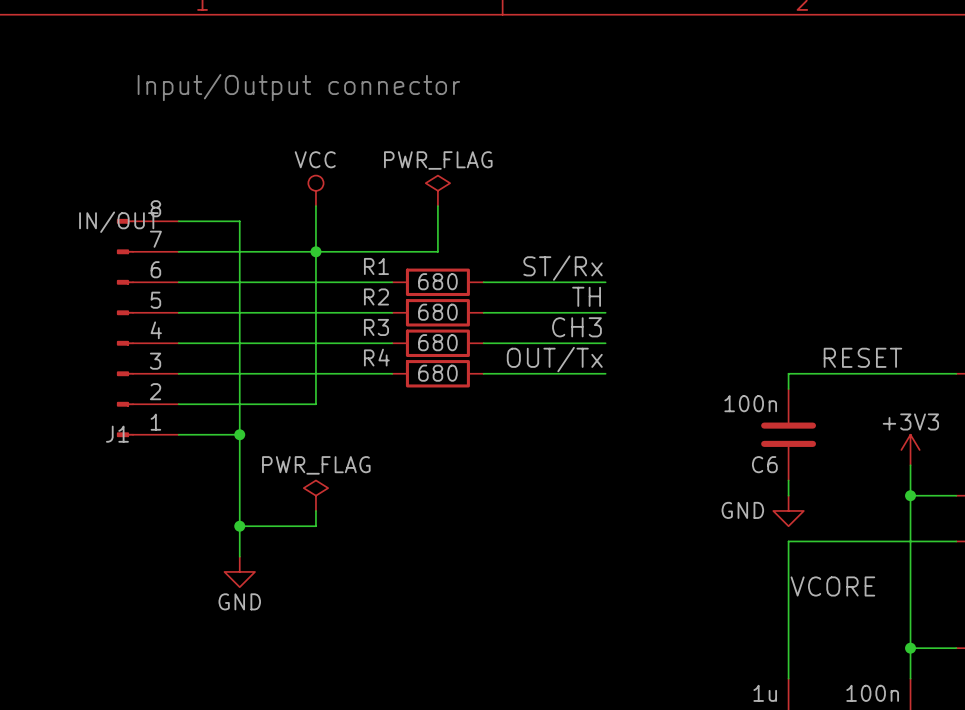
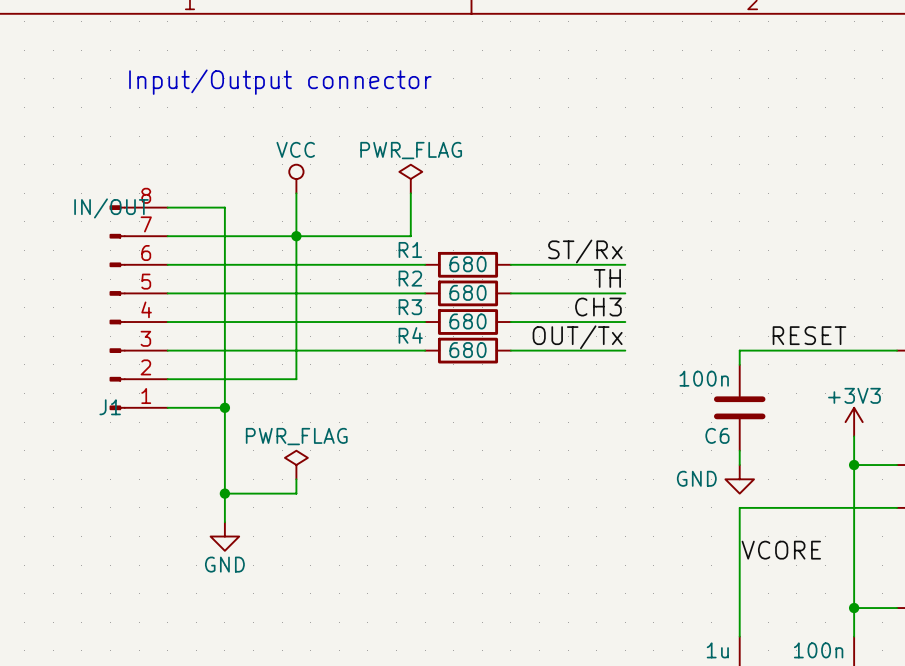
label position: ST/Rx (563, 268) -> ST/Rx (585, 251)
R1 position: (437, 282) -> (468, 264)
wire: (483, 282) (544, 282) -> (367, 264) (425, 264)
wire: none -> (568, 264) (625, 264)
label position: TH (586, 296) -> TH (607, 278)
R2 position: (437, 312) -> (468, 293)
wire: (483, 312) (544, 312) -> (367, 293) (425, 293)
wire: none -> (568, 293) (625, 293)
label position: CH3 (576, 327) -> CH3 (598, 307)
R3 position: (437, 343) -> (468, 322)
wire: (483, 343) (544, 343) -> (367, 322) (425, 322)
wire: none -> (568, 322) (625, 322)
label position: OUT/Tx (554, 359) -> OUT/Tx (577, 337)
R4 position: (437, 373) -> (468, 350)
wire: (483, 373) (544, 373) -> (367, 350) (425, 350)
wire: none -> (568, 350) (625, 350)

